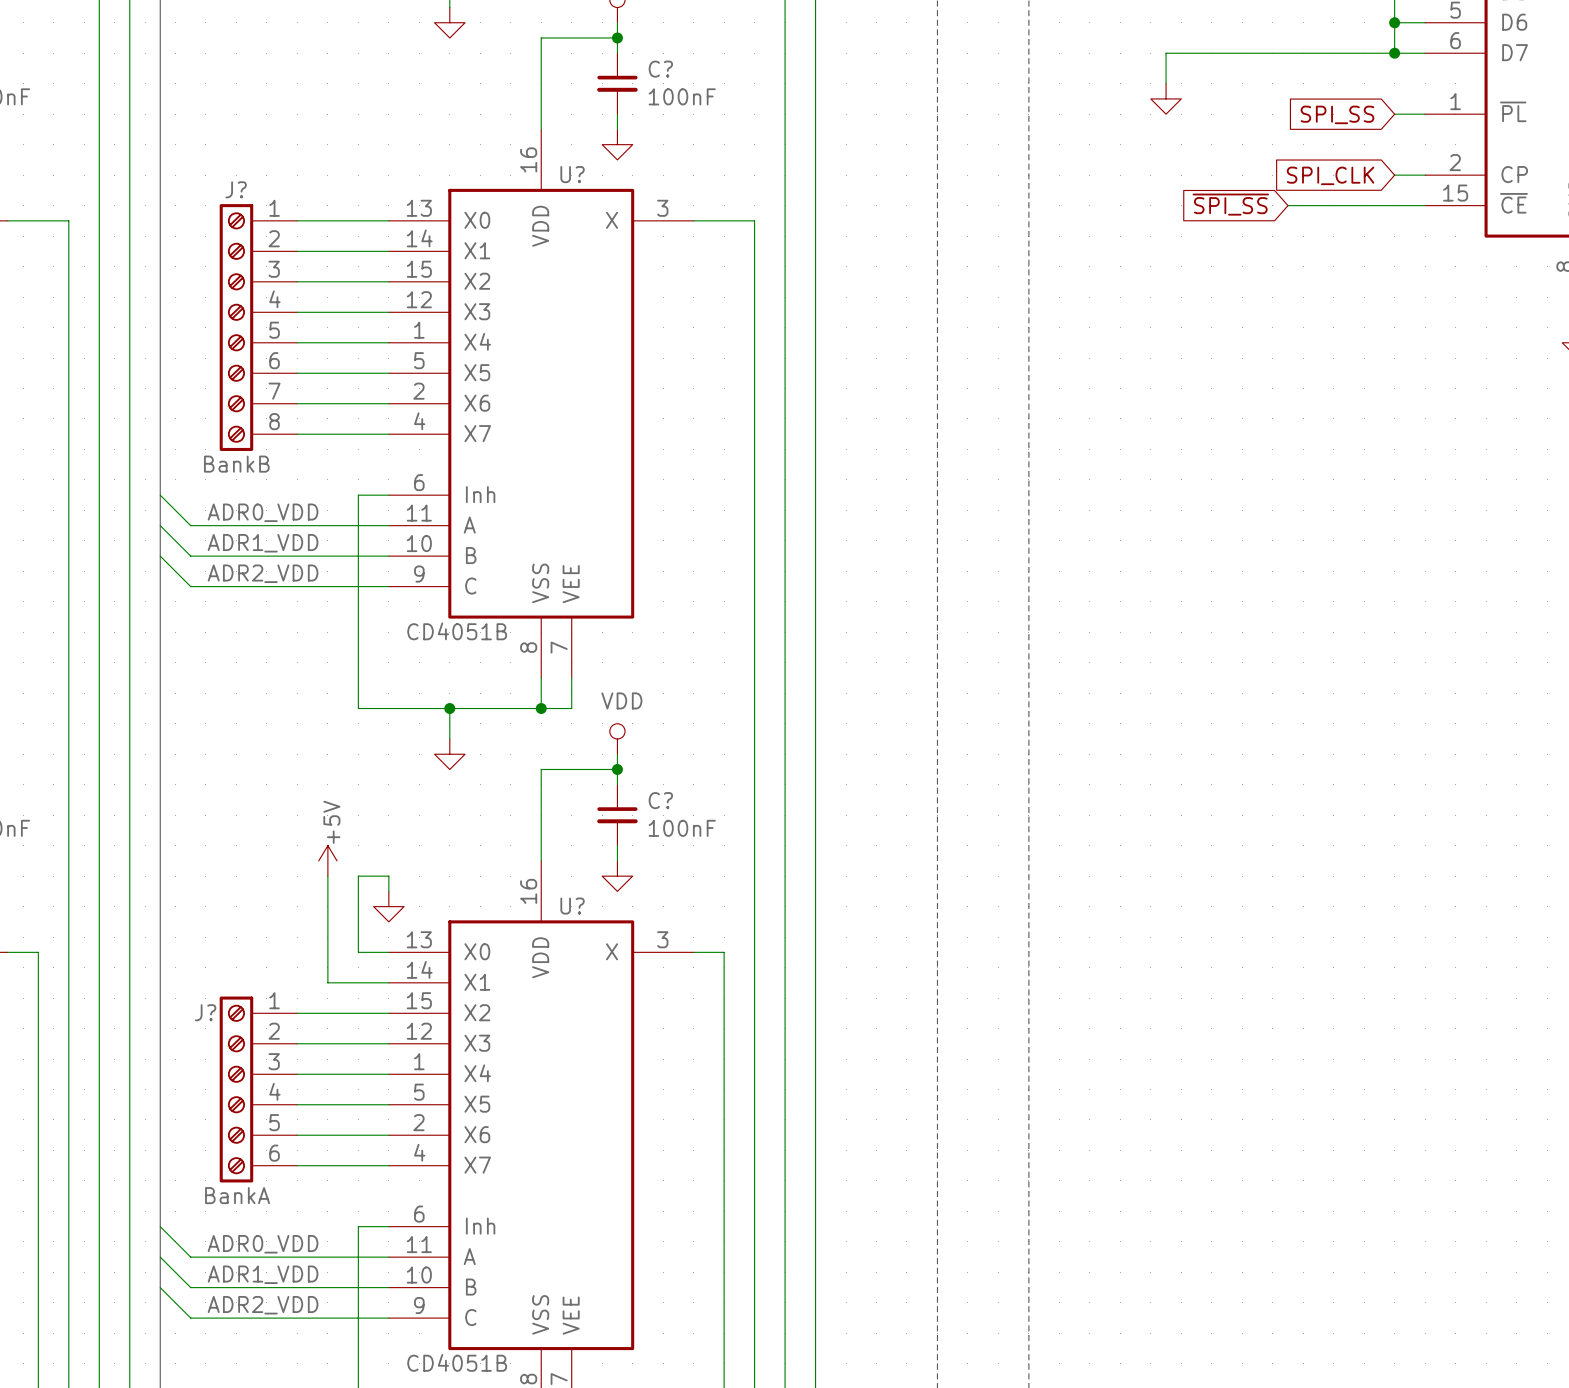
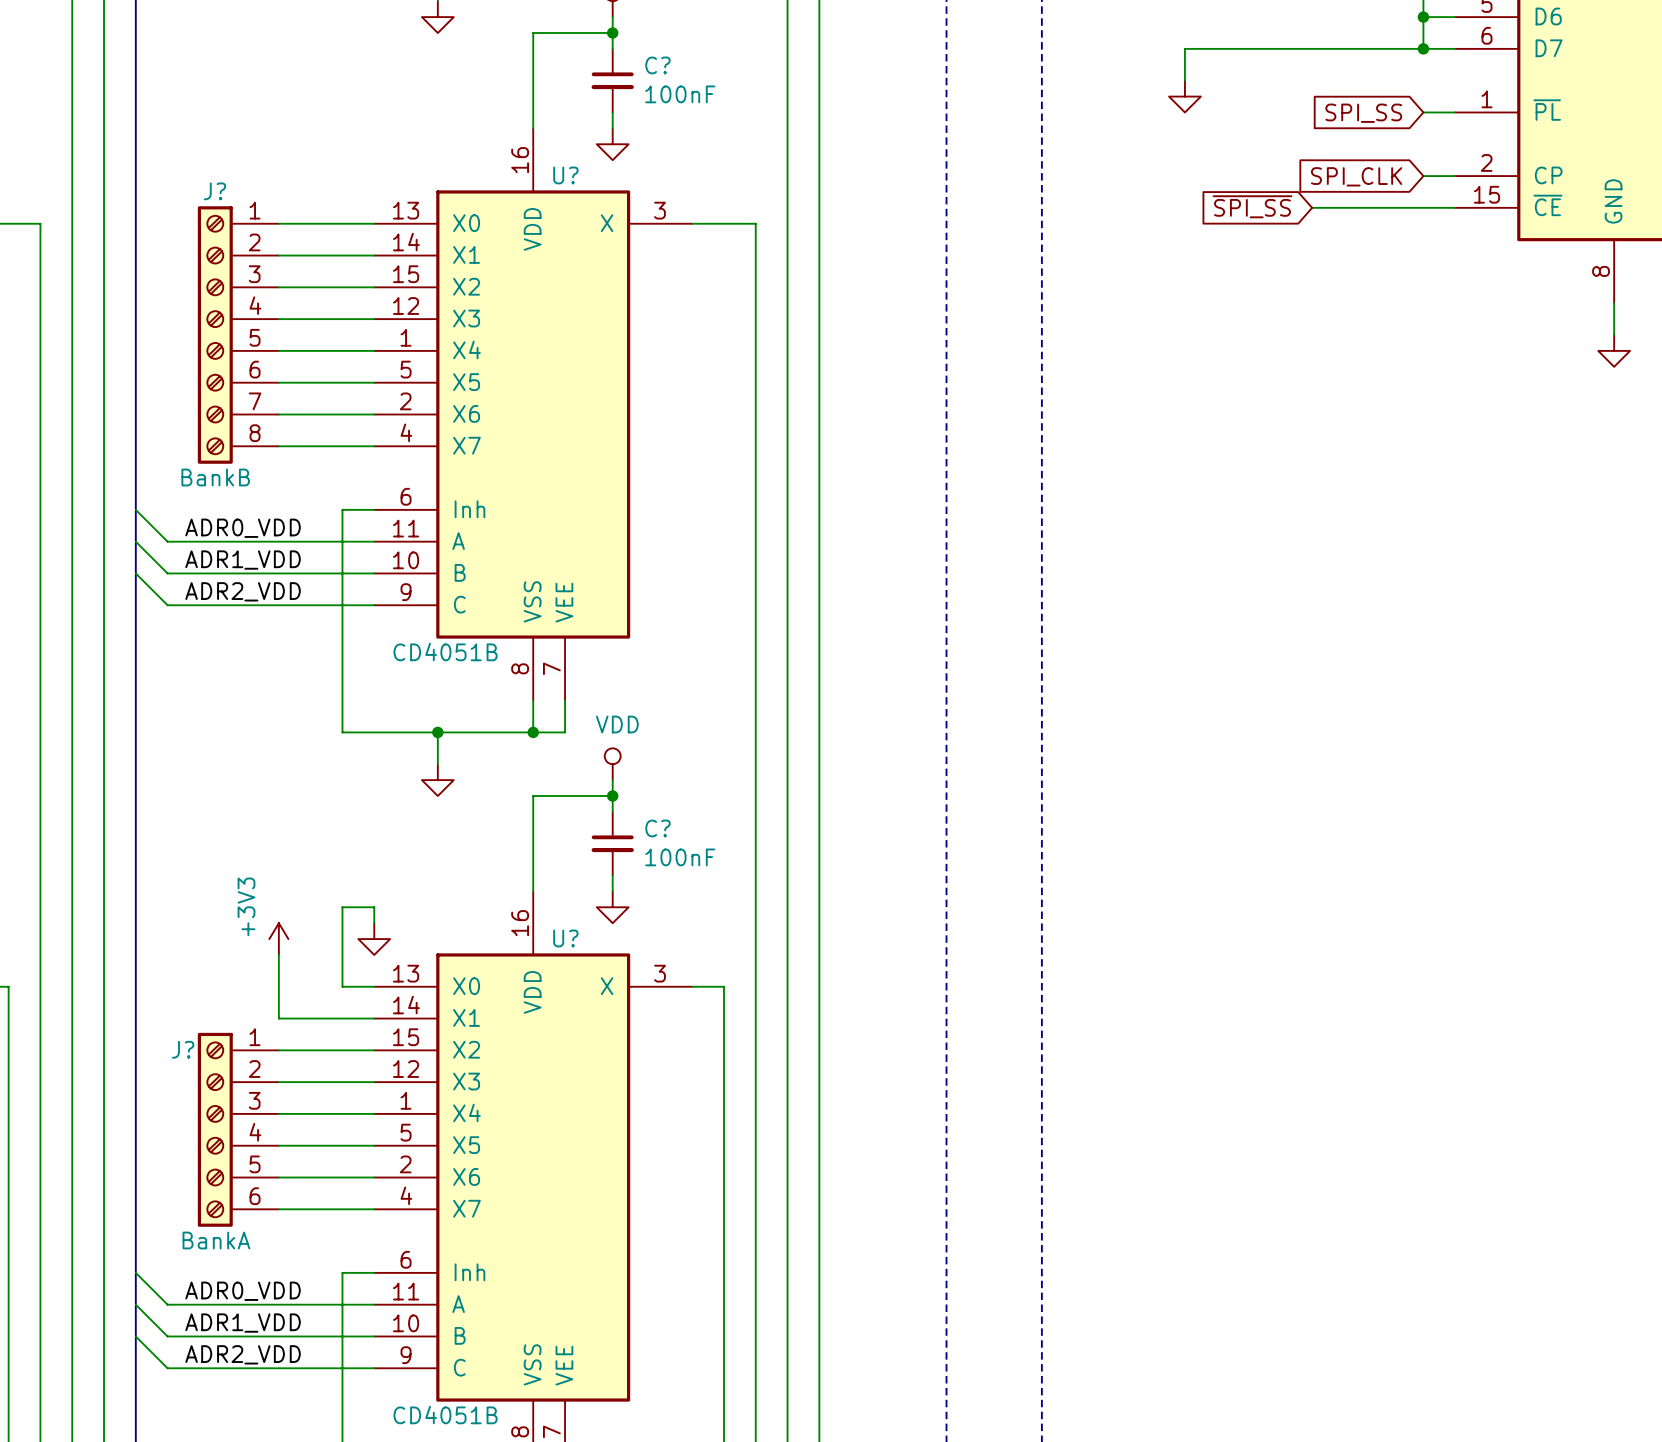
power symbol: +5V (327, 860) -> none
wire: (327, 876) (327, 982) -> (278, 954) (278, 1018) (310, 1018)
power symbol: none -> +3V3 (278, 939)

